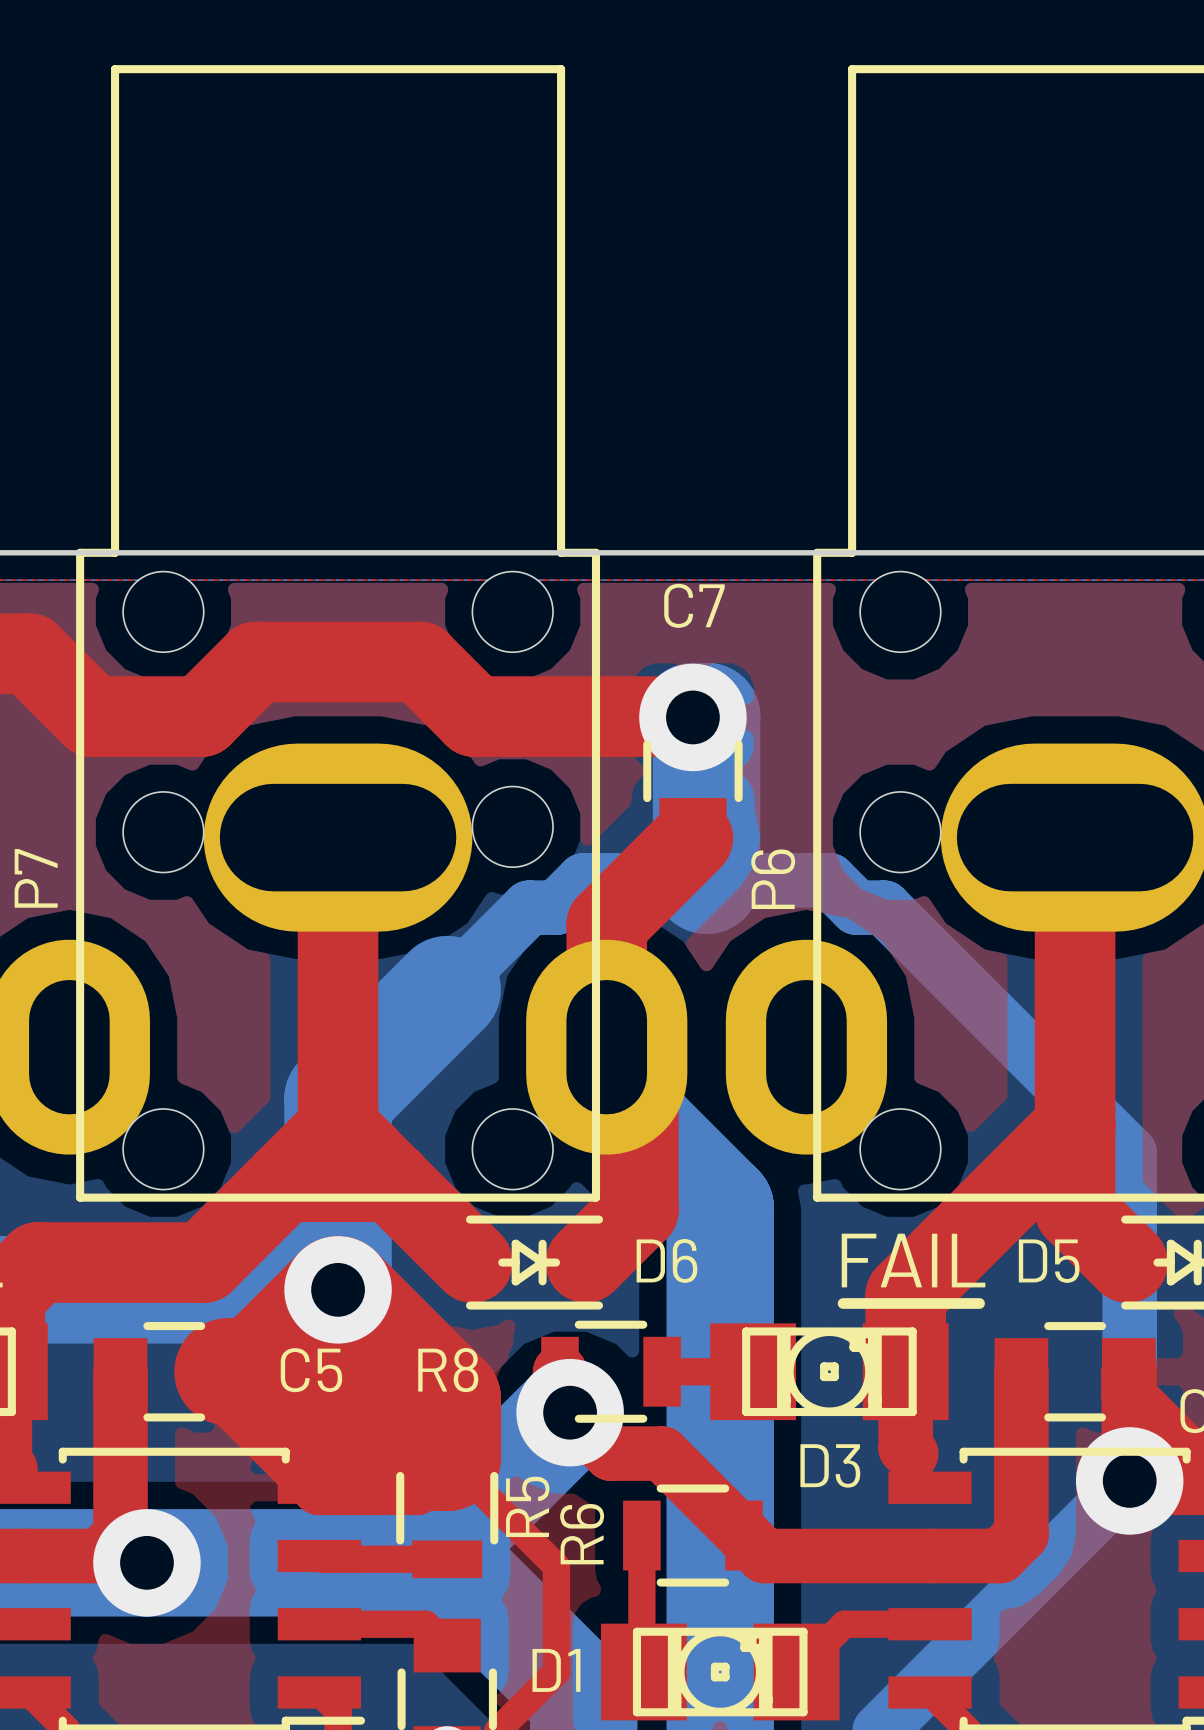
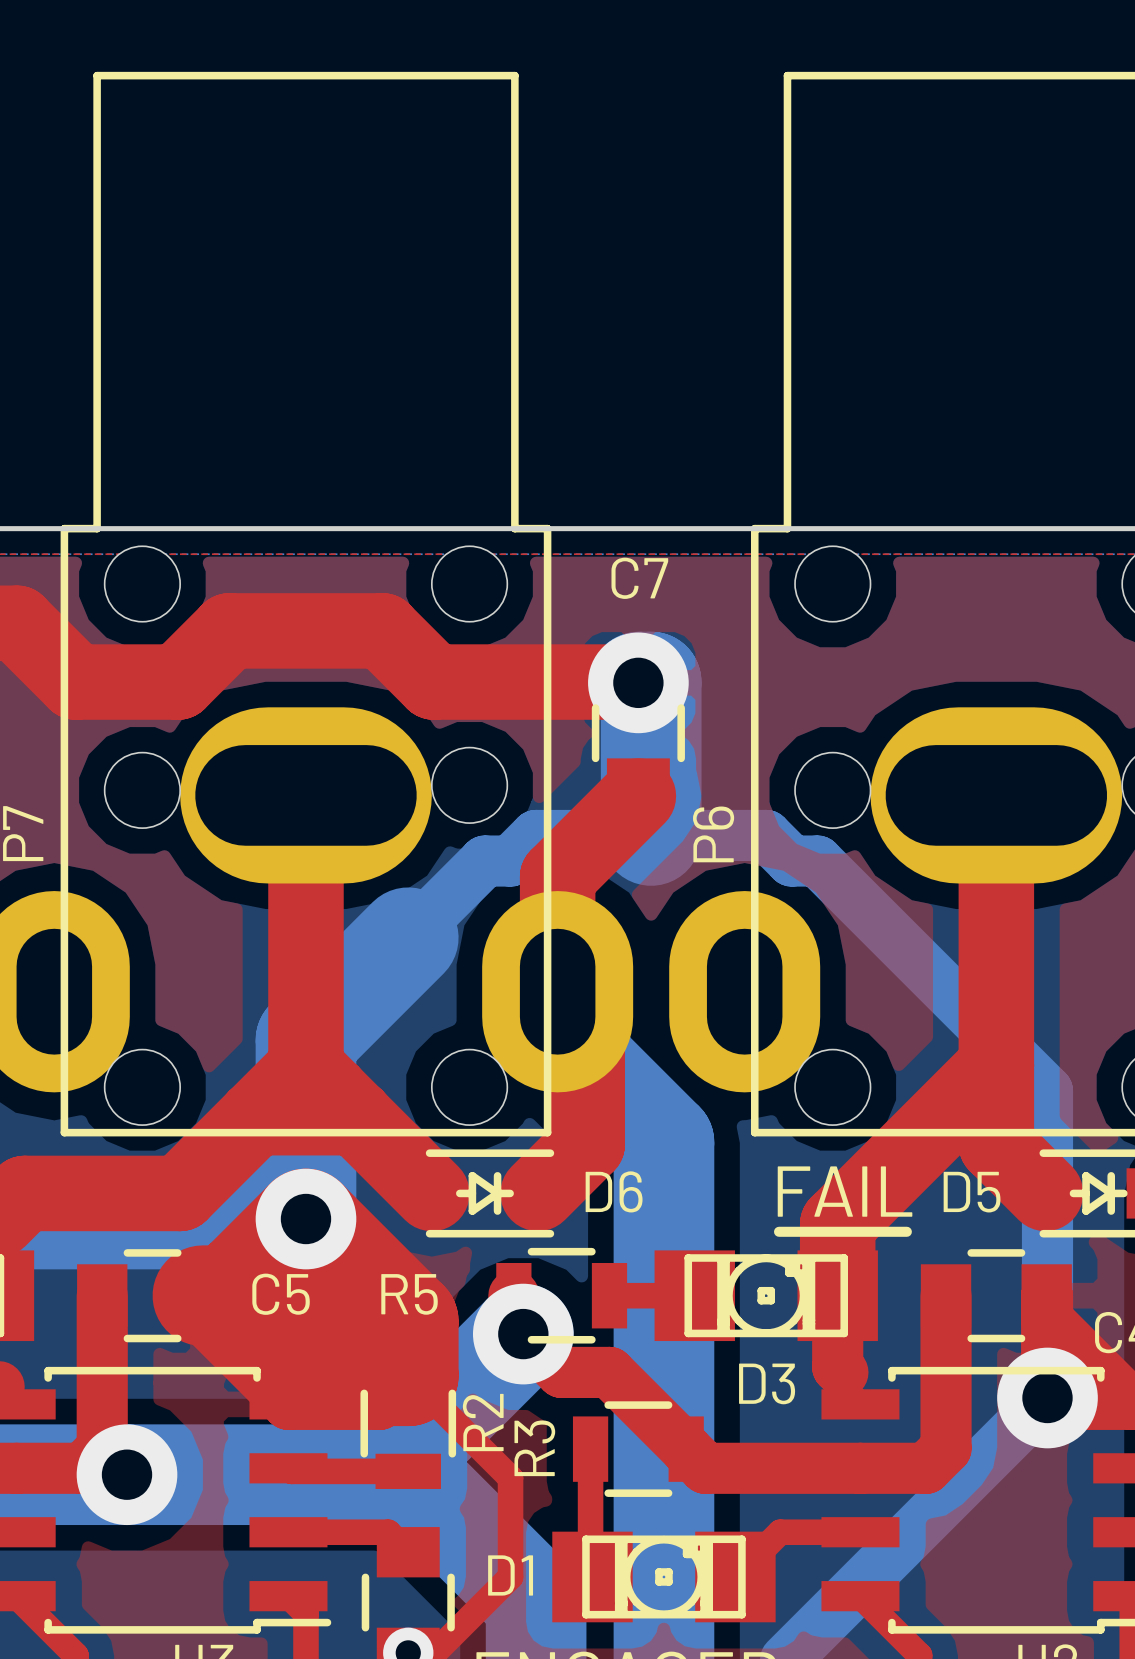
R8 name: R8 (448, 1370) -> R5 (409, 1294)
R5 name: R5 (527, 1506) -> R2 (483, 1422)
R6 name: R6 (582, 1534) -> R3 (534, 1448)

